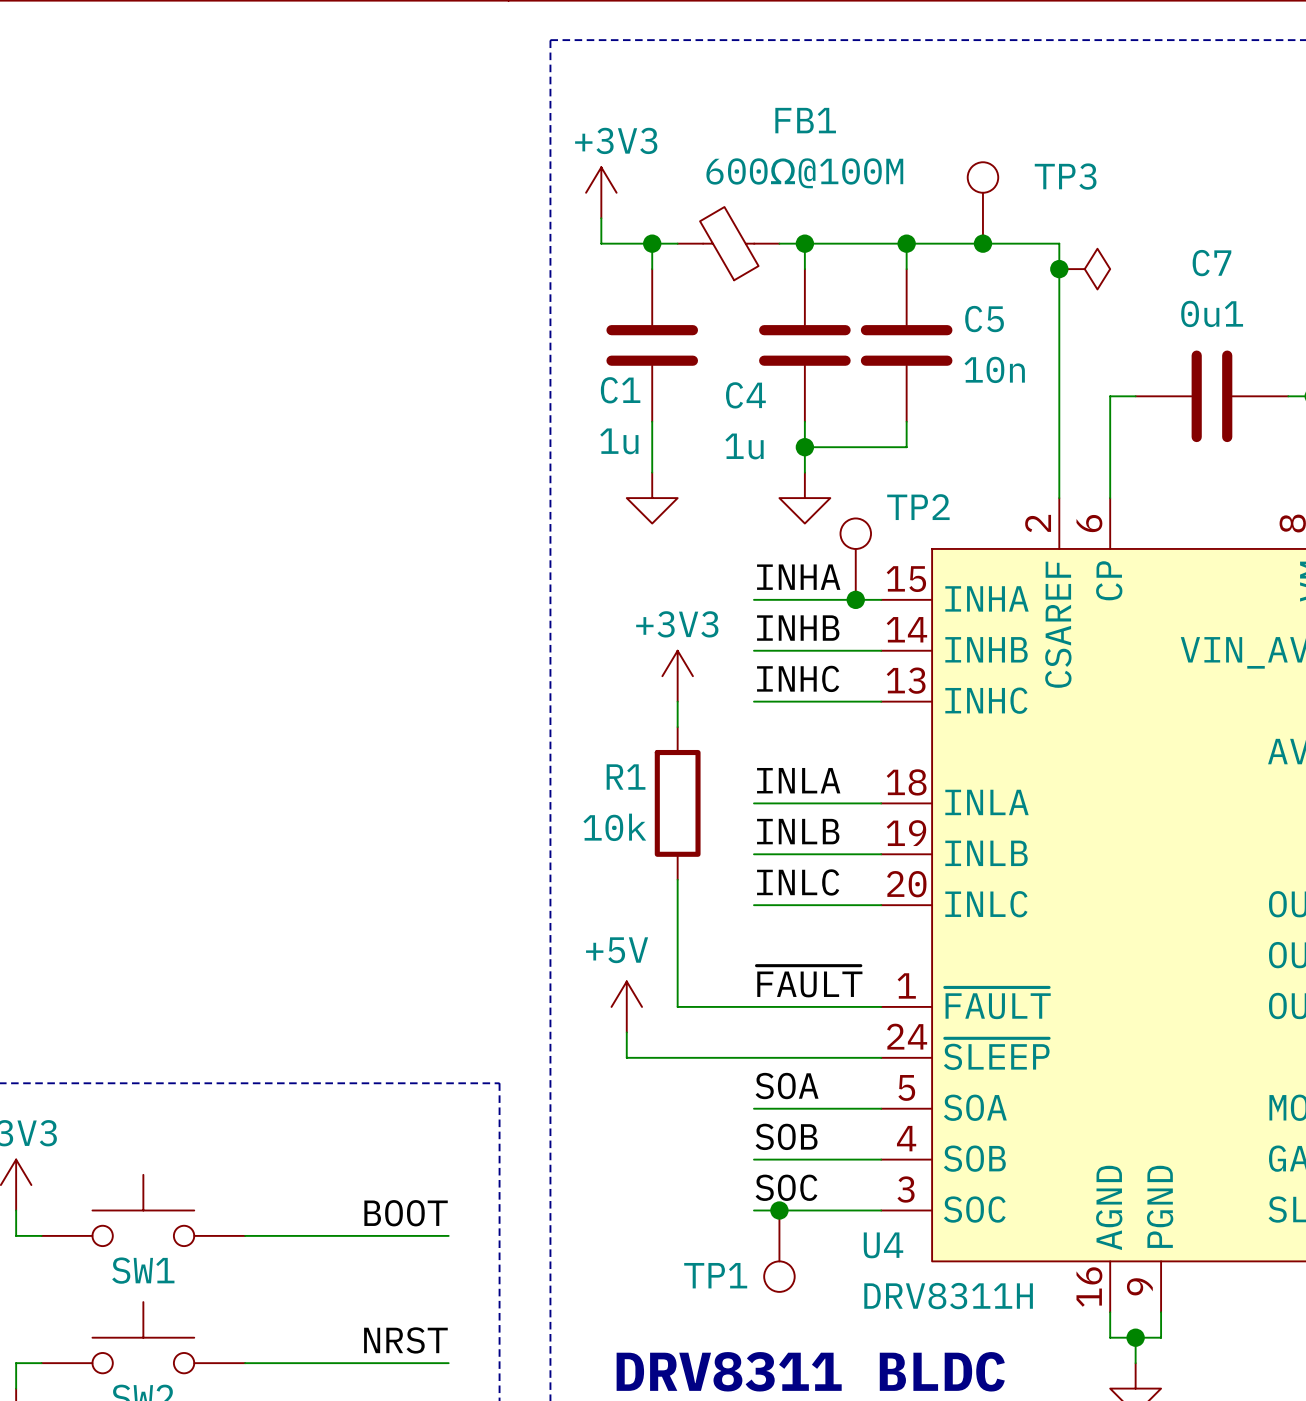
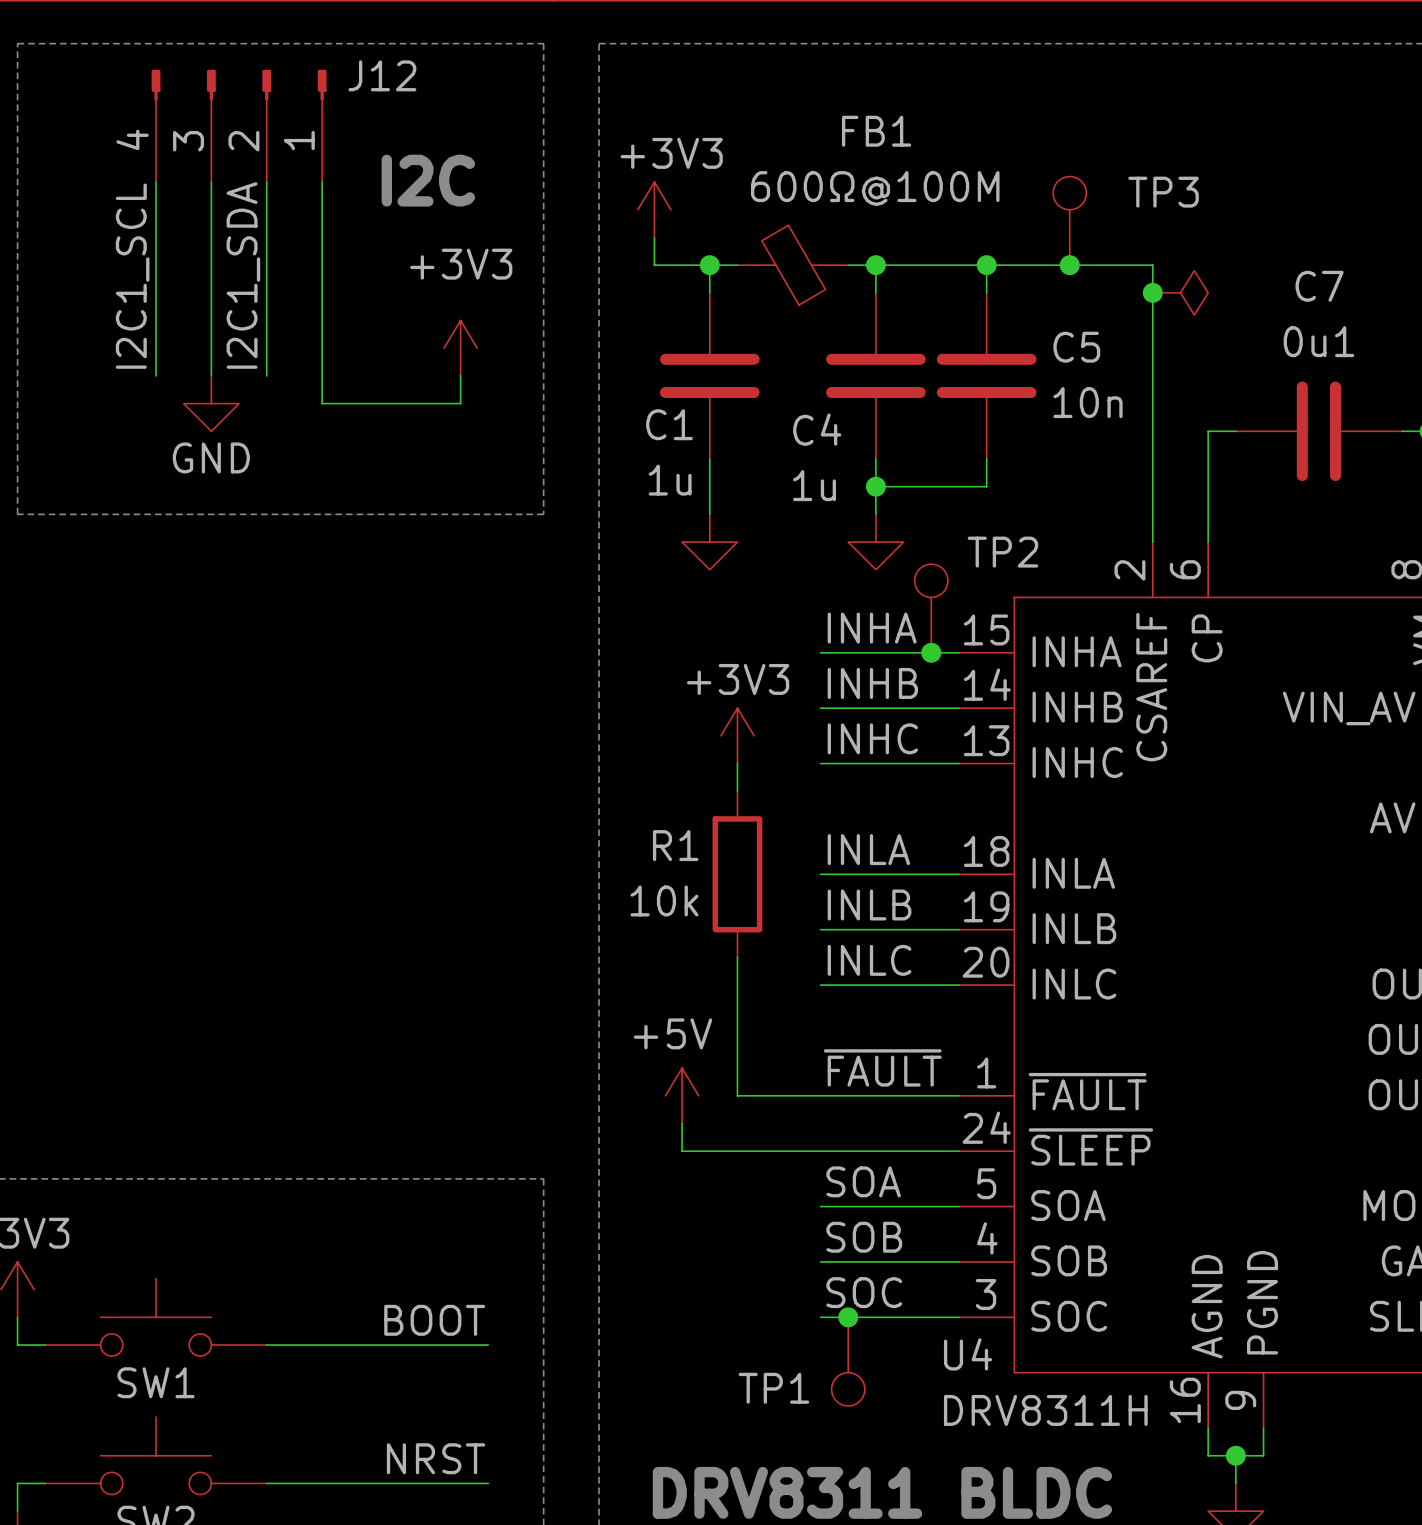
line: none -> (17, 43) (543, 43) (543, 514) (17, 514) (17, 43)
J12: none -> (239, 125)
text: none -> I2C (428, 180)
wire: none -> (156, 182) (156, 375)
wire: none -> (211, 182) (211, 375)
wire: none -> (266, 182) (266, 375)
wire: none -> (322, 182) (322, 403) (460, 403) (460, 375)
label: none -> I2C1_SDA (243, 275)
label: none -> I2C1_SCL (132, 276)
power symbol: none -> +3V3 (460, 348)
power symbol: none -> GND (211, 403)

